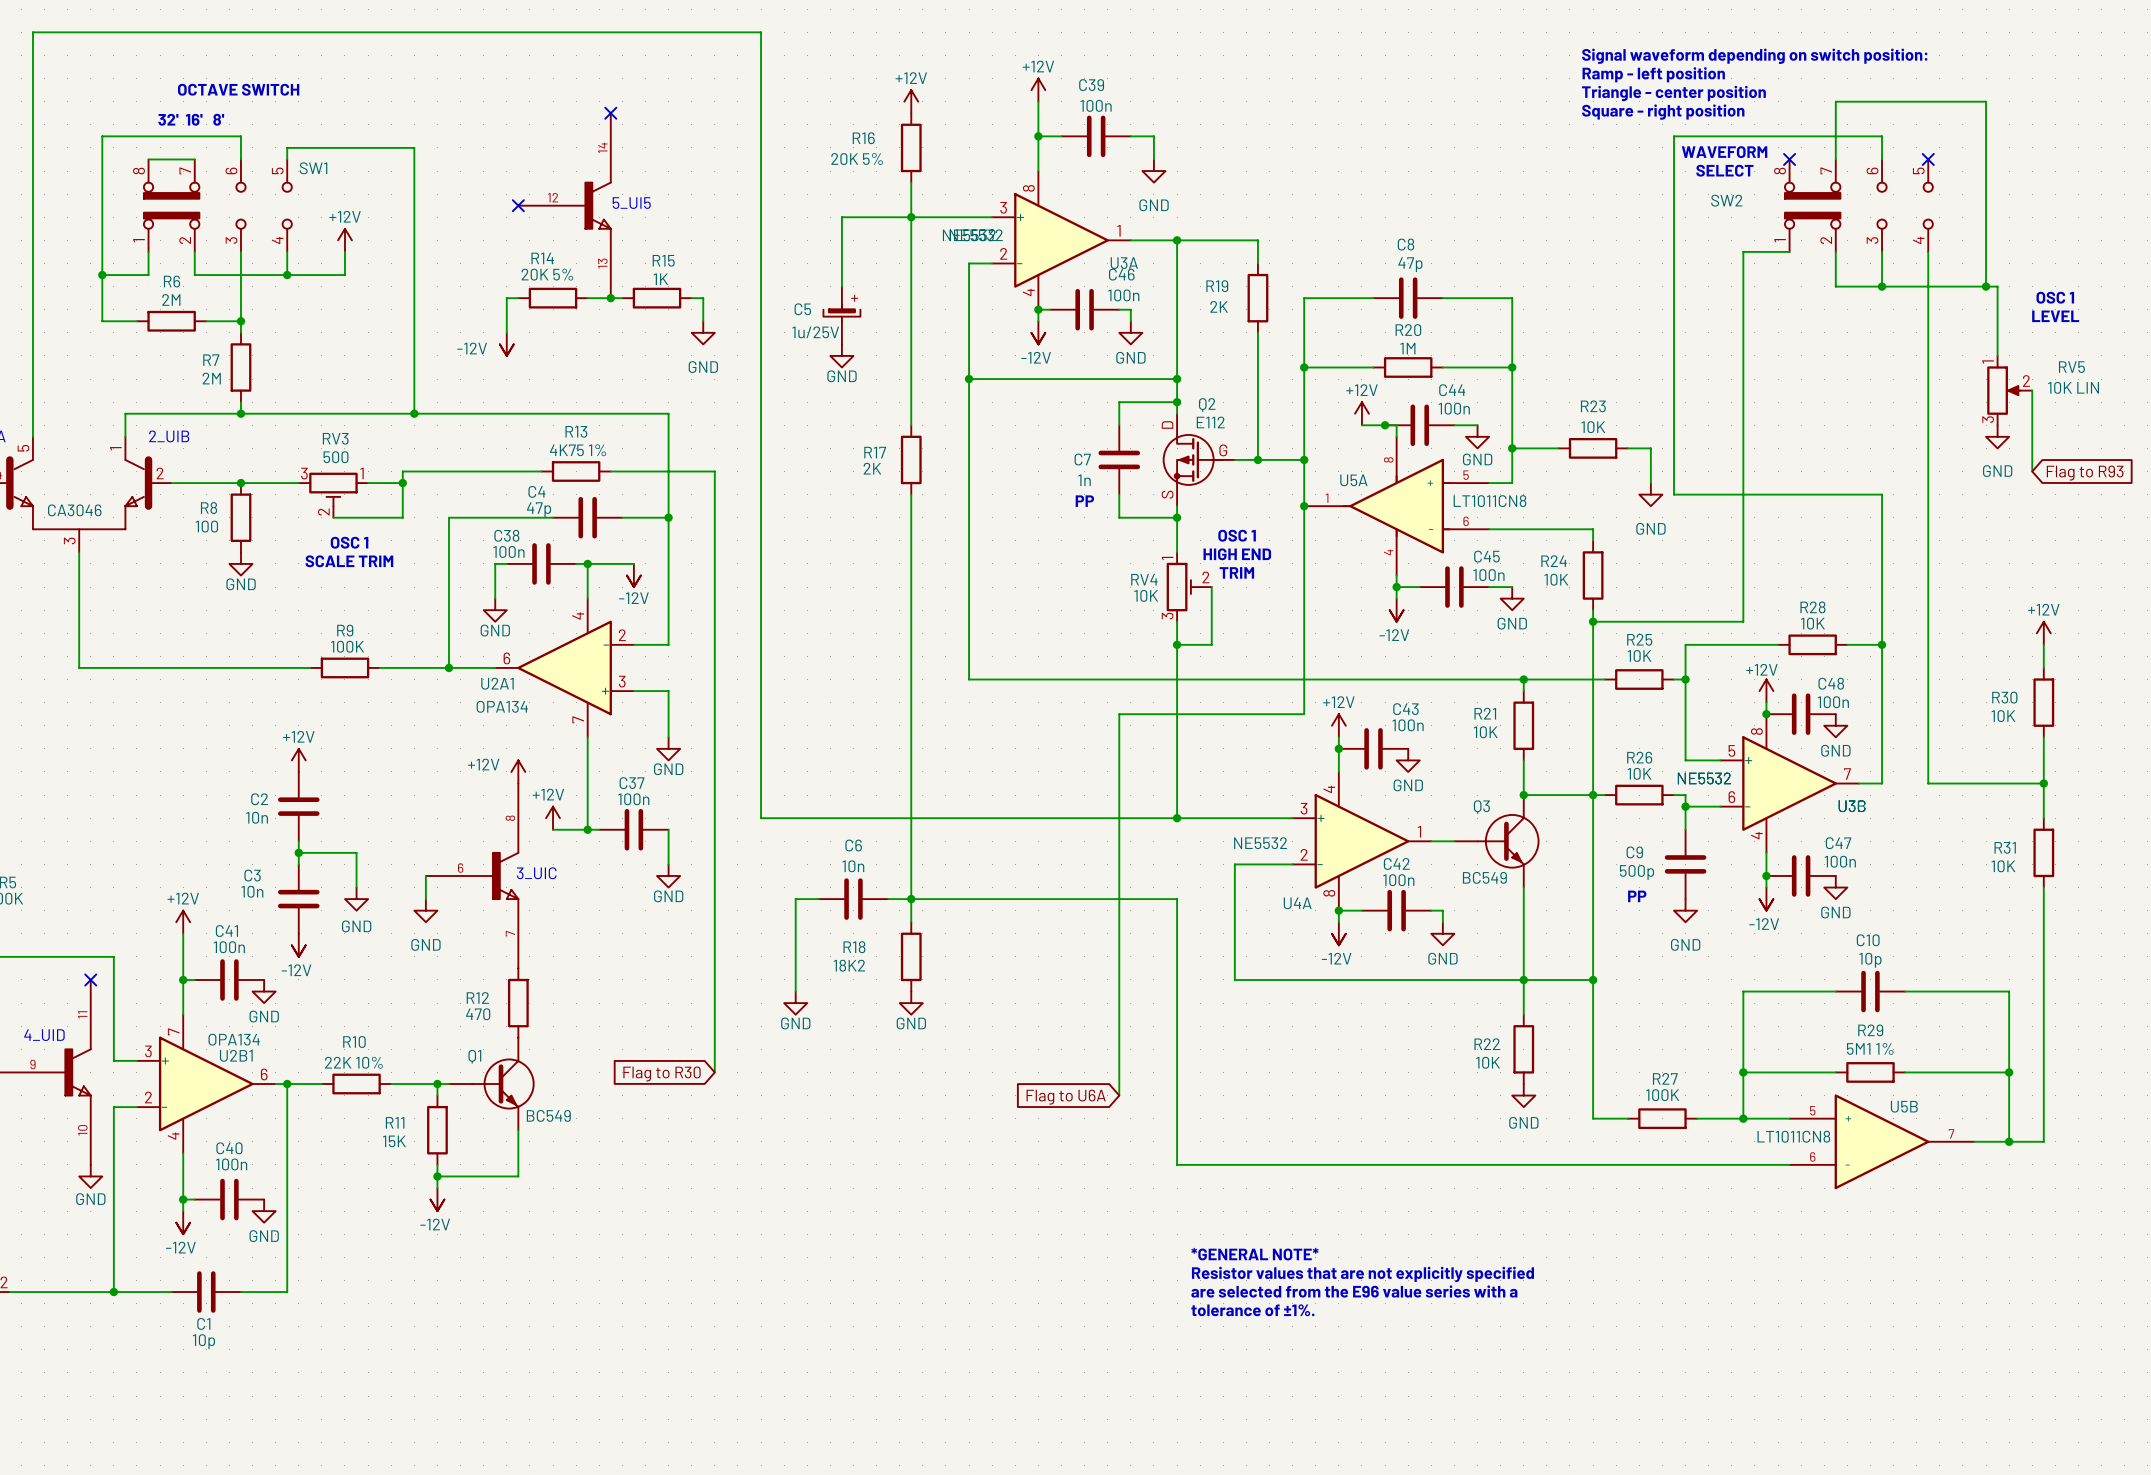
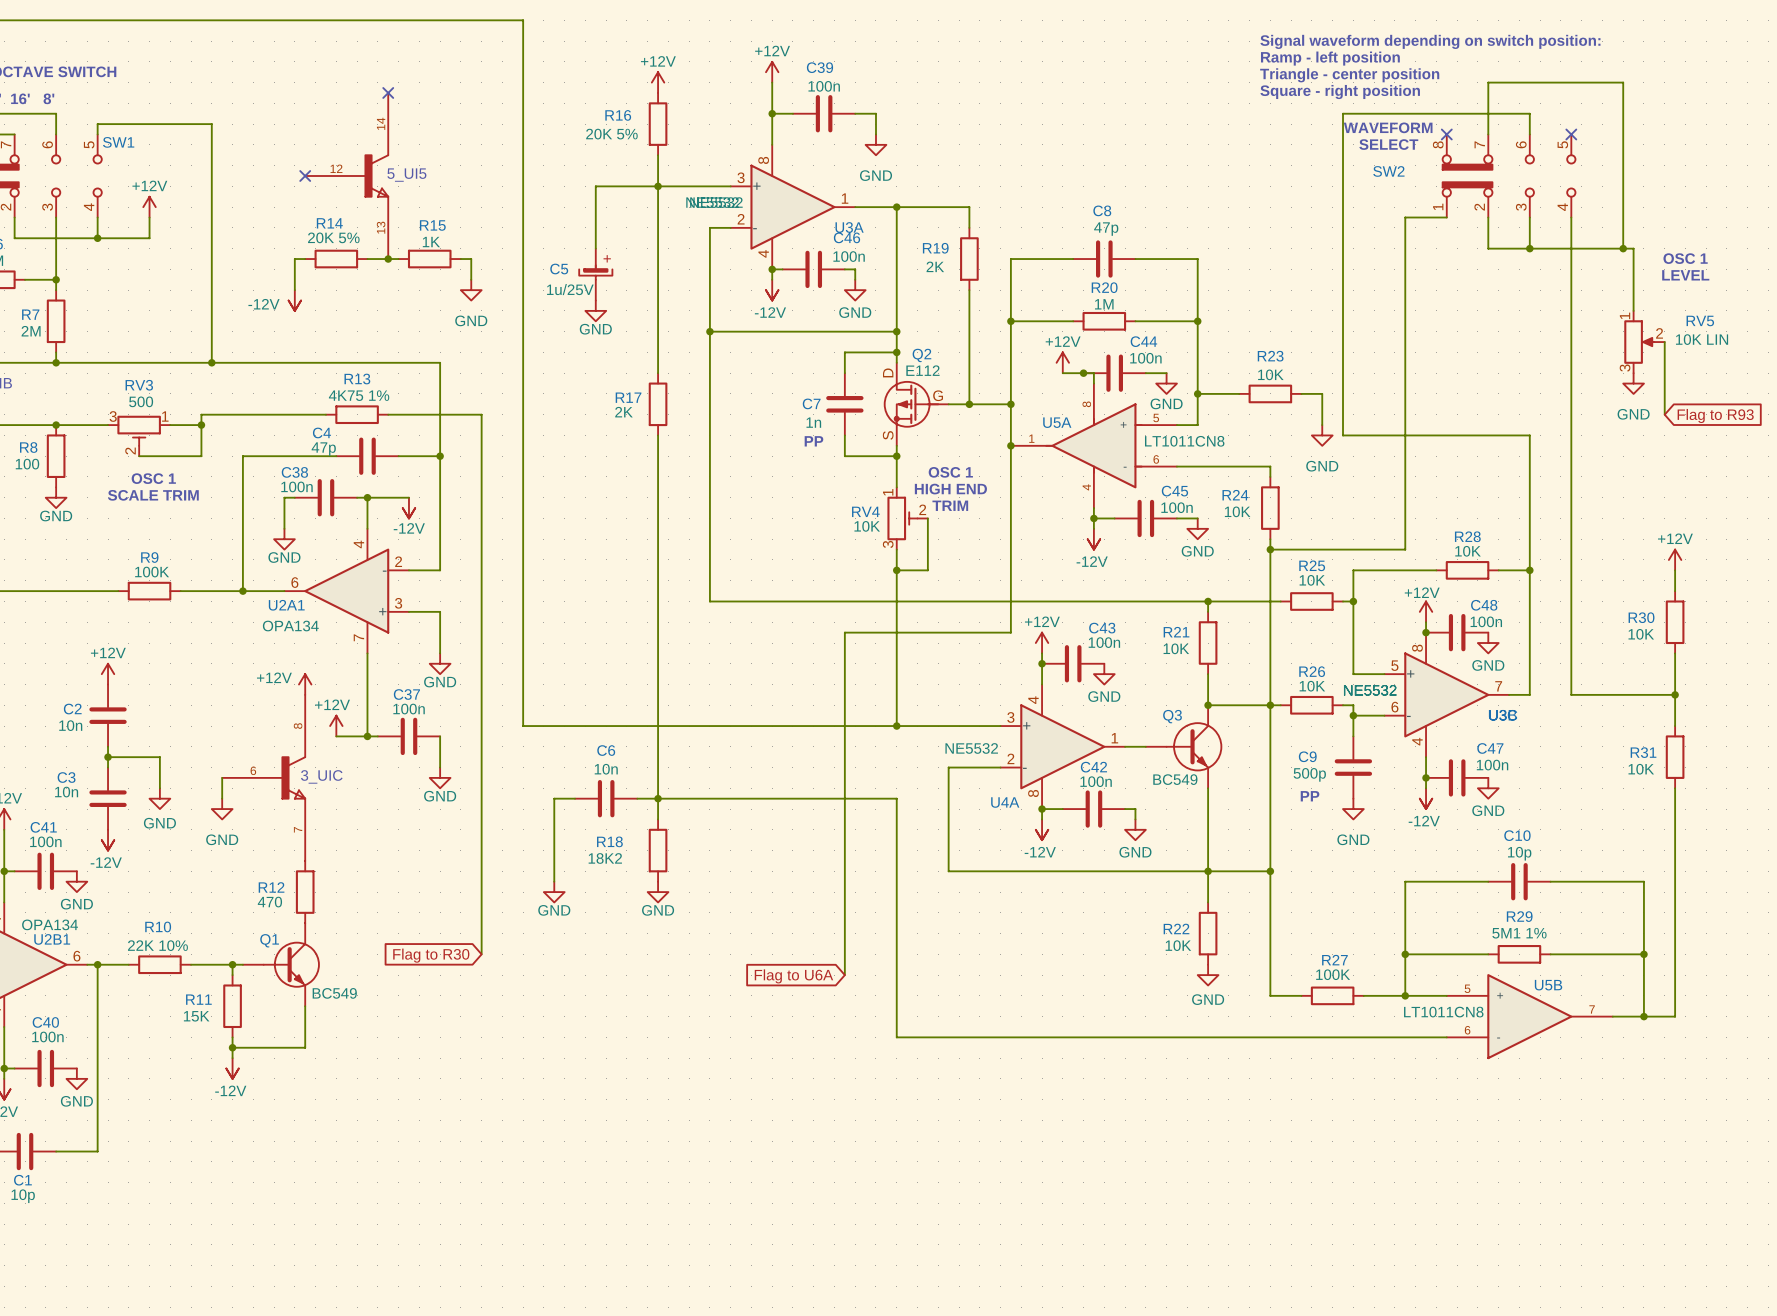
text: *GENERAL NOTE* (1254, 1254) -> none
text: Resistor values that are not explicitly specified (1362, 1274) -> none
text: are selected from the E96 value series with a (1354, 1291) -> none
text: tolerance of ±1%. (1252, 1310) -> none

